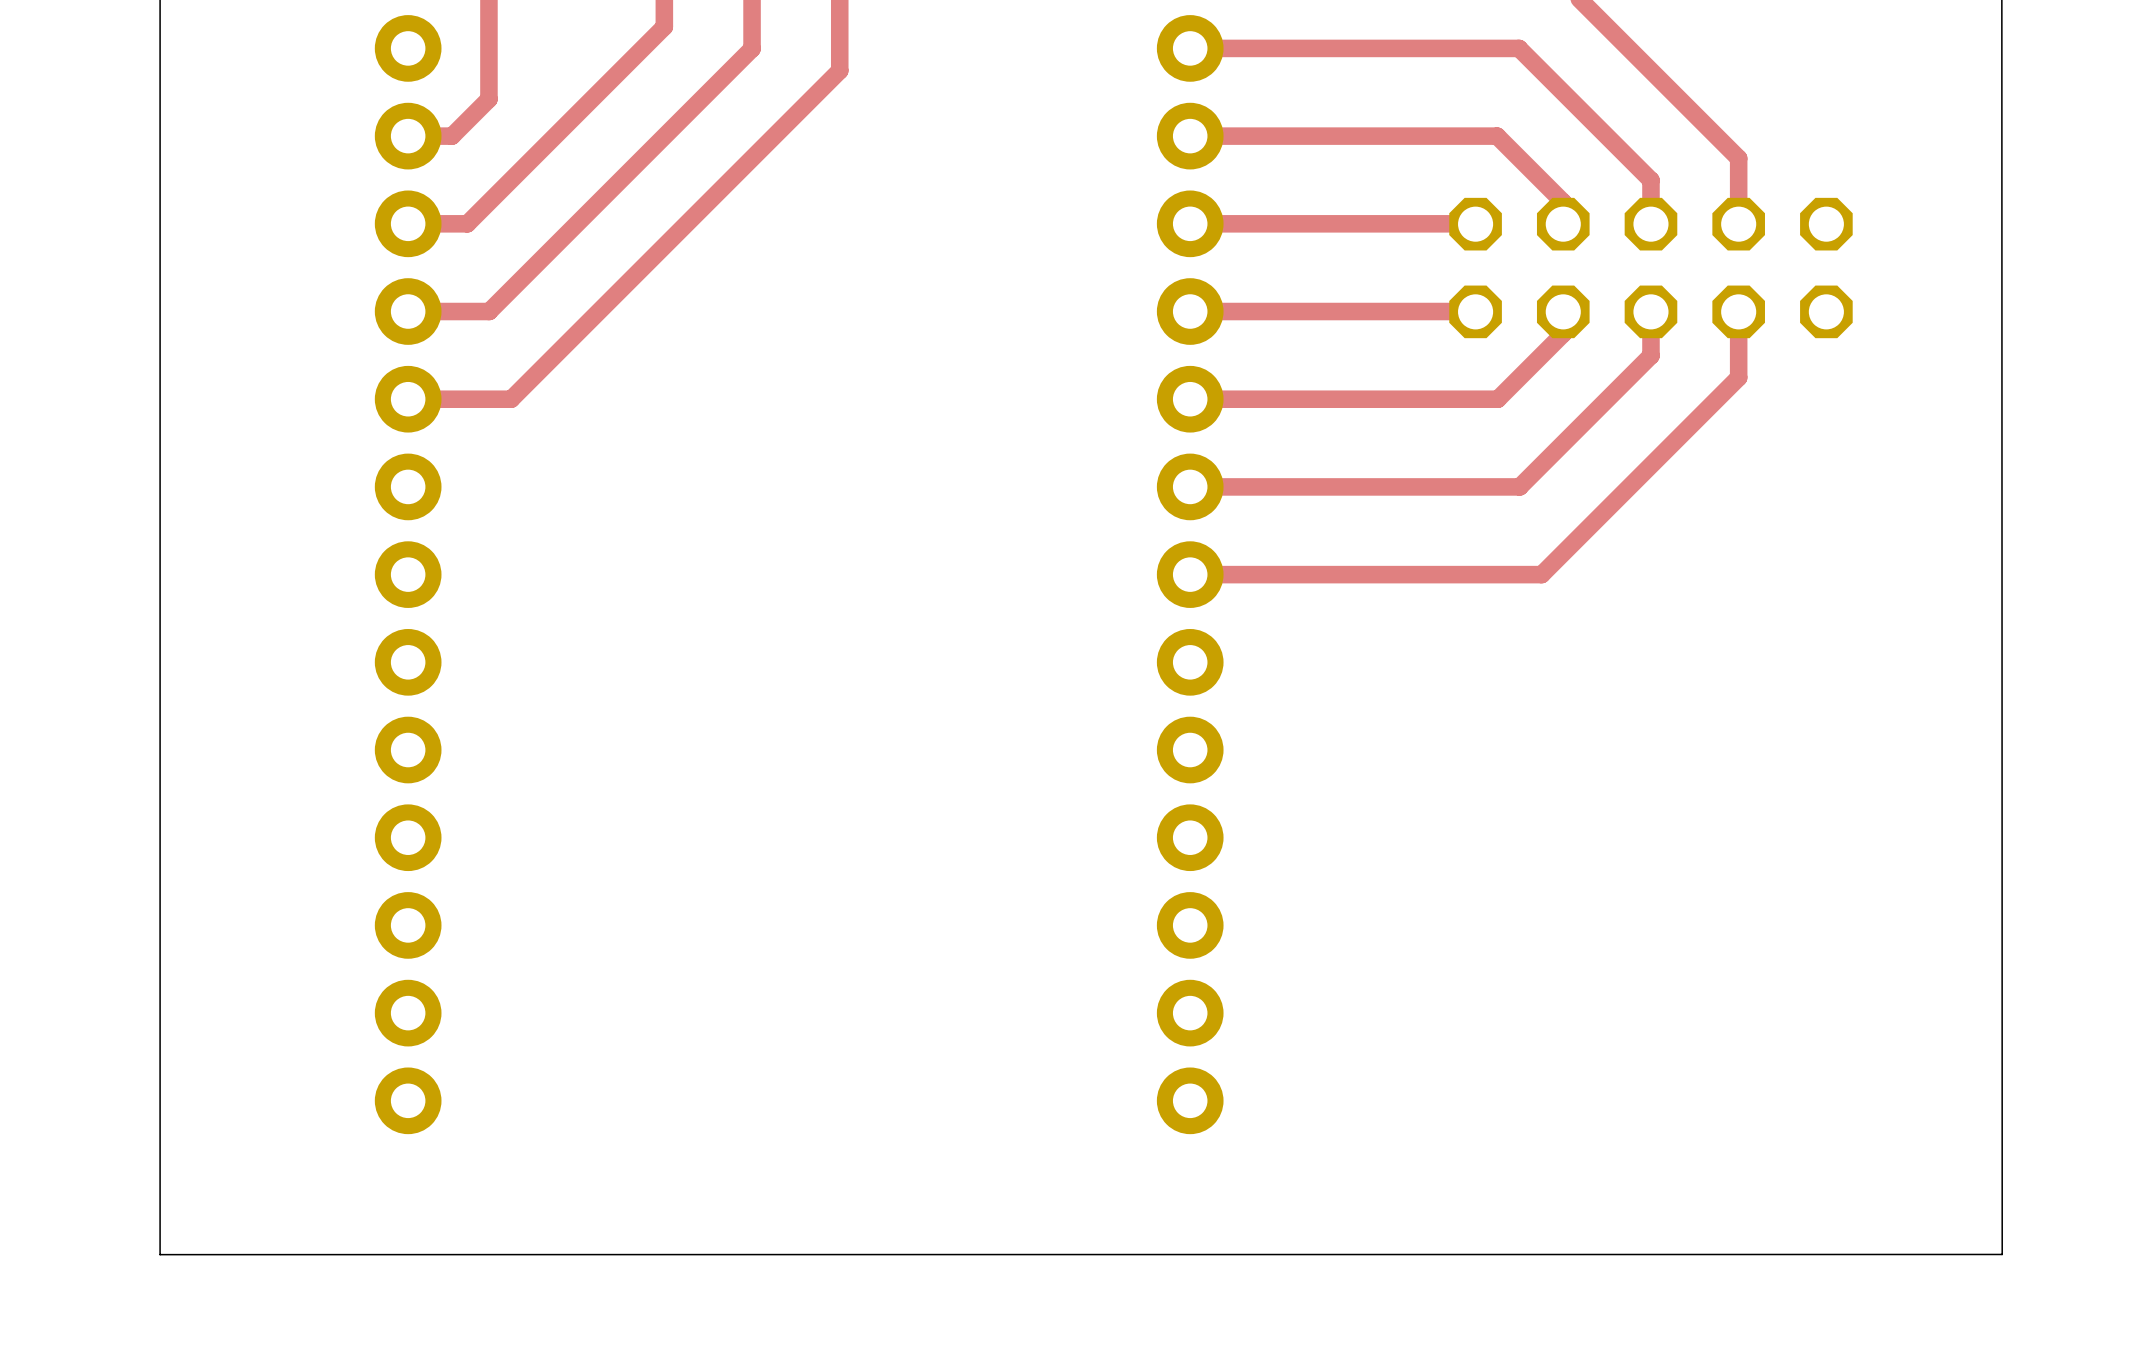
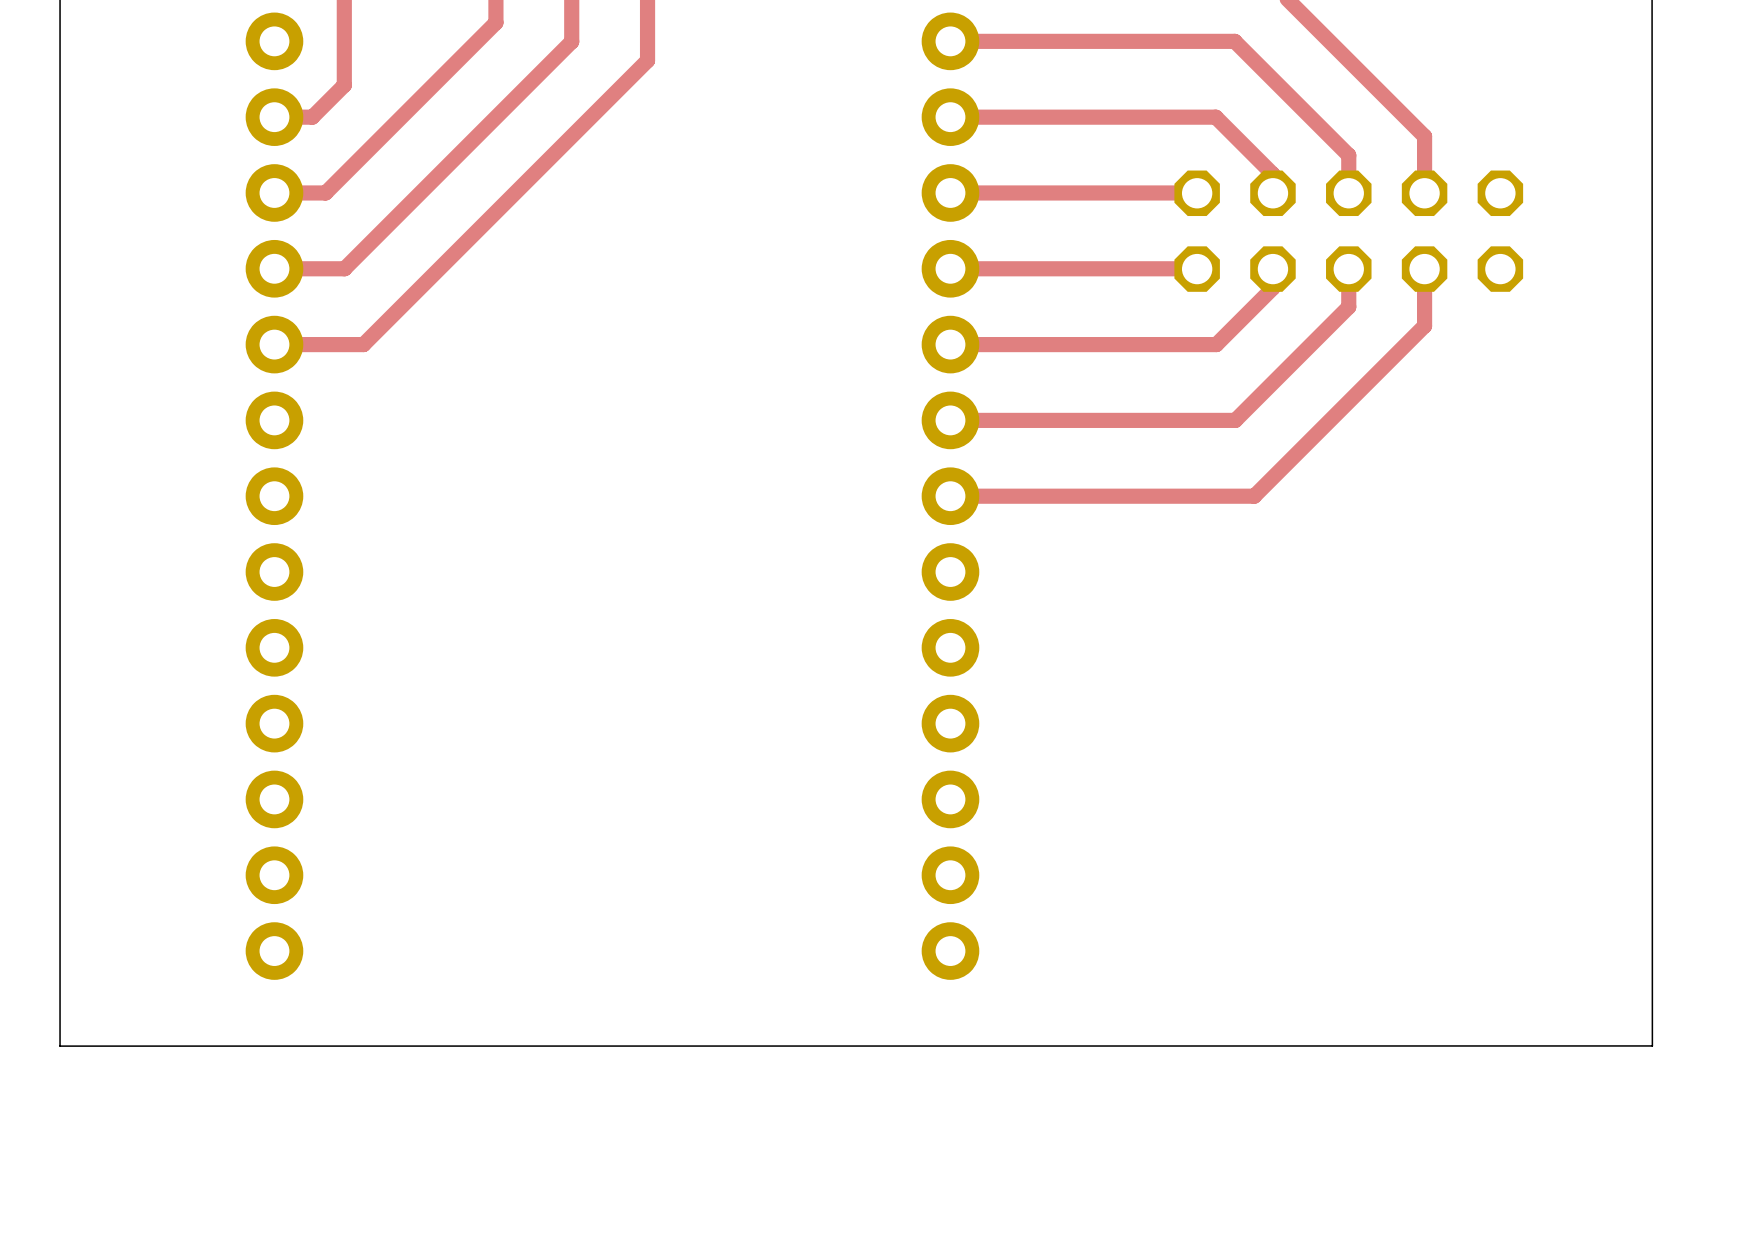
board edge: (2002, 1210) (2002, 1254) (160, 1254) (160, 1210) -> (1652, 1045) (60, 1046)

